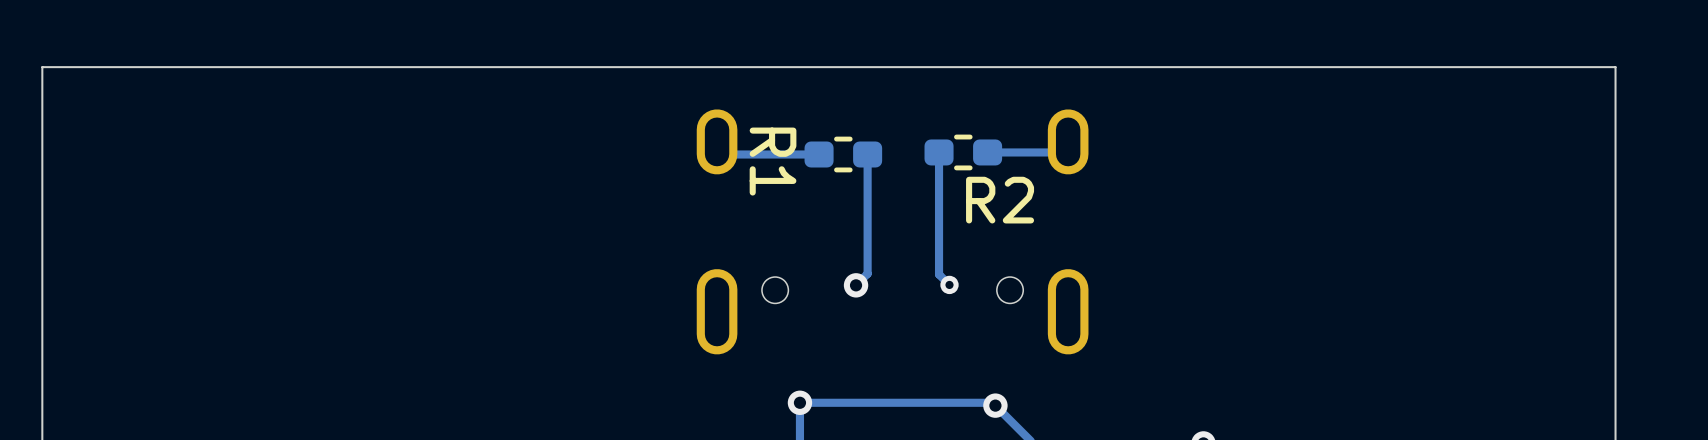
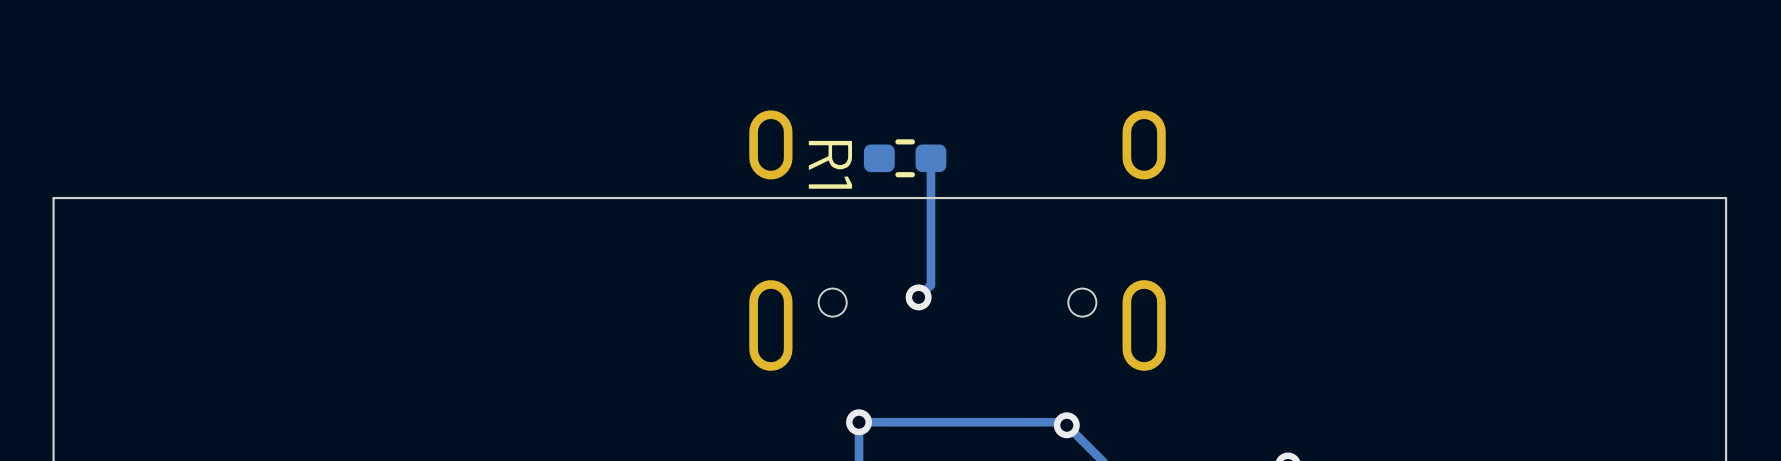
track: (717, 141) (729, 154) (819, 154) -> none
track: (1068, 141) (1057, 152) (987, 152) -> none
track: (939, 152) (939, 274) (949, 284) -> none
R2: (963, 152) -> none
board edge: (1615, 191) (1615, 67) (42, 67) (42, 191) -> (1726, 198) (53, 198)
via: (949, 284) -> none

